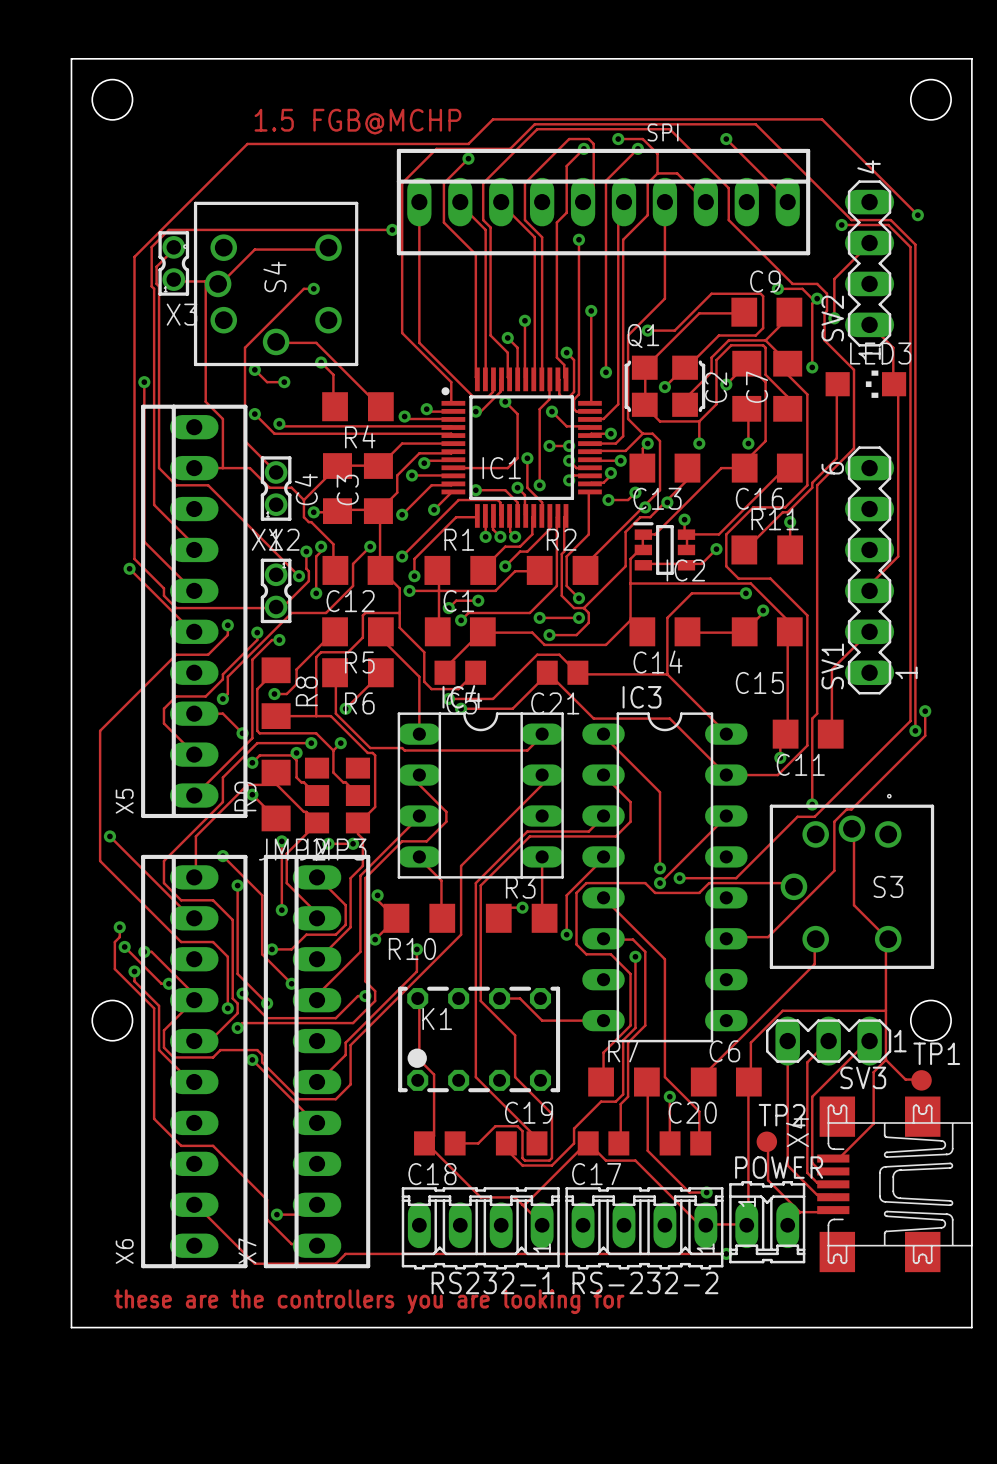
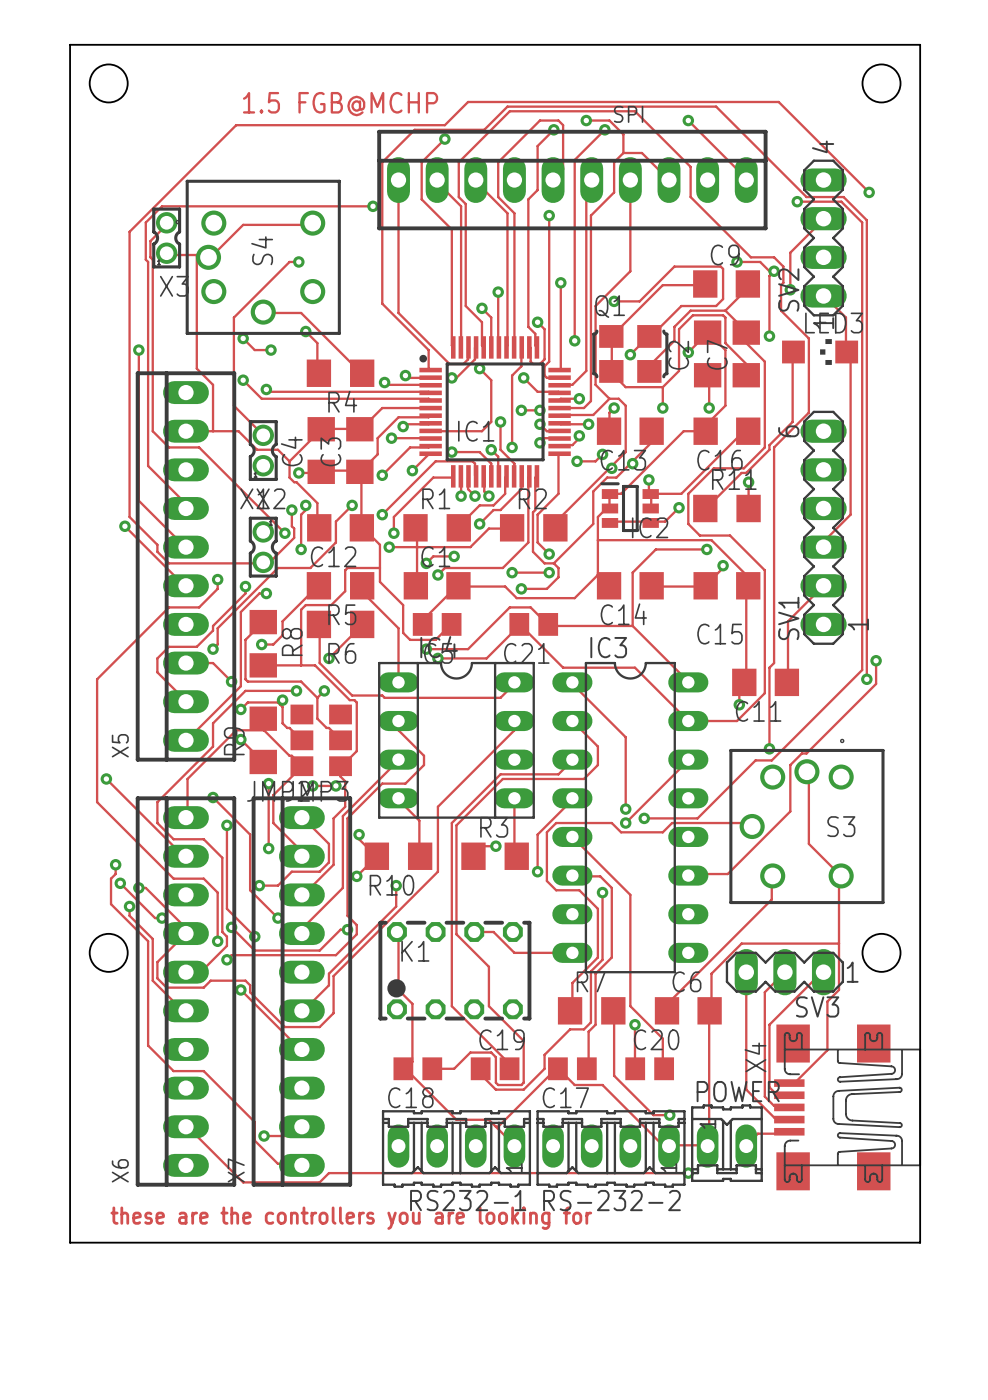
track: (885, 1059) (905, 1079) (921, 1080) -> none
TP1: (921, 1080) -> none
track: (766, 1141) (768, 1180) (799, 1212) -> none
TP2: (766, 1141) -> none

